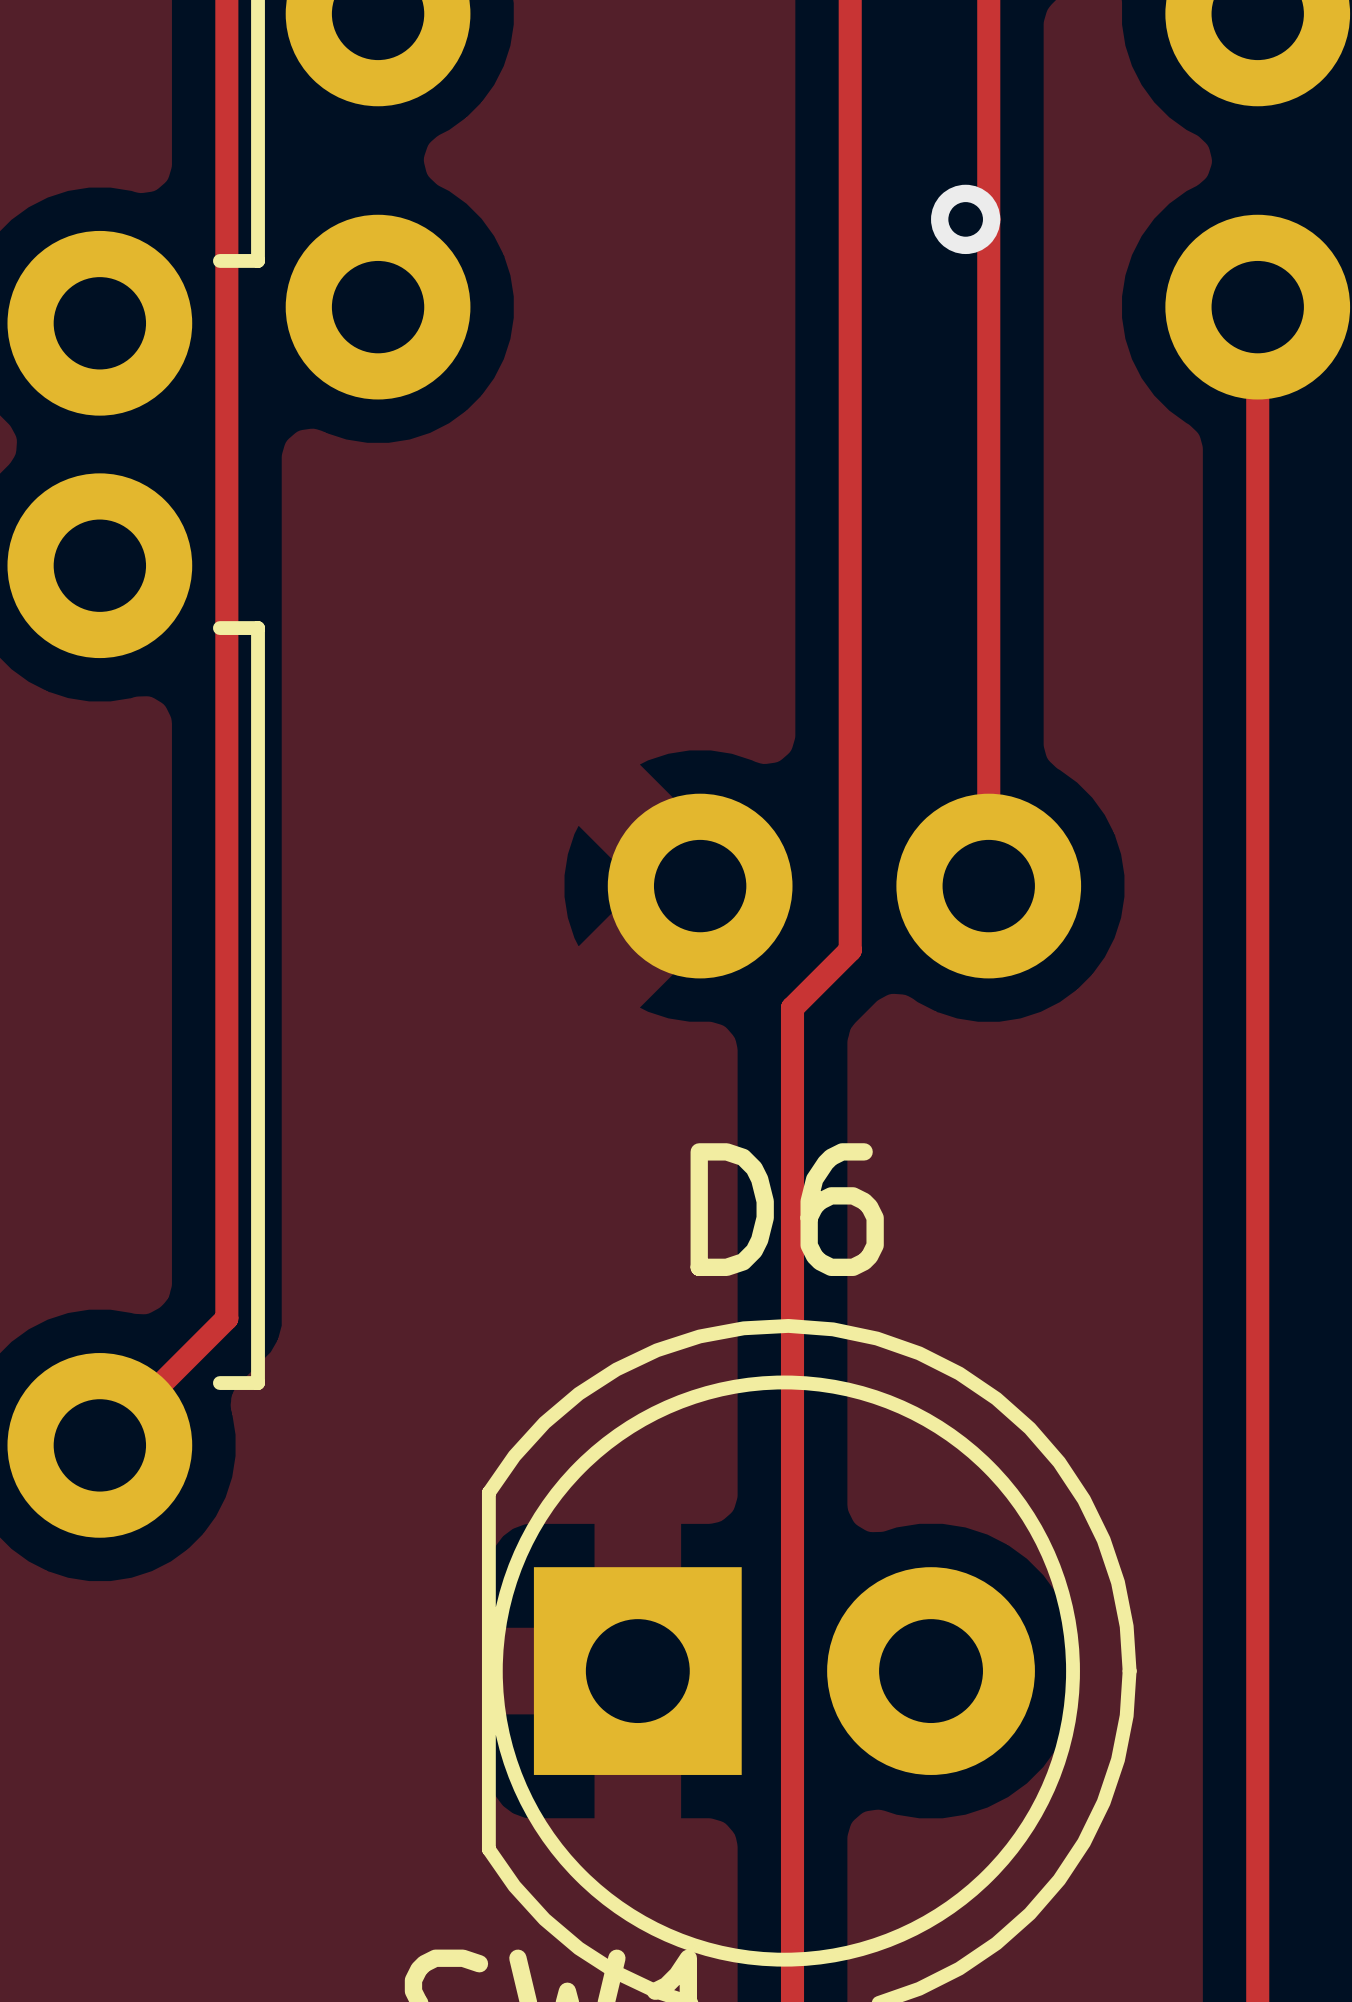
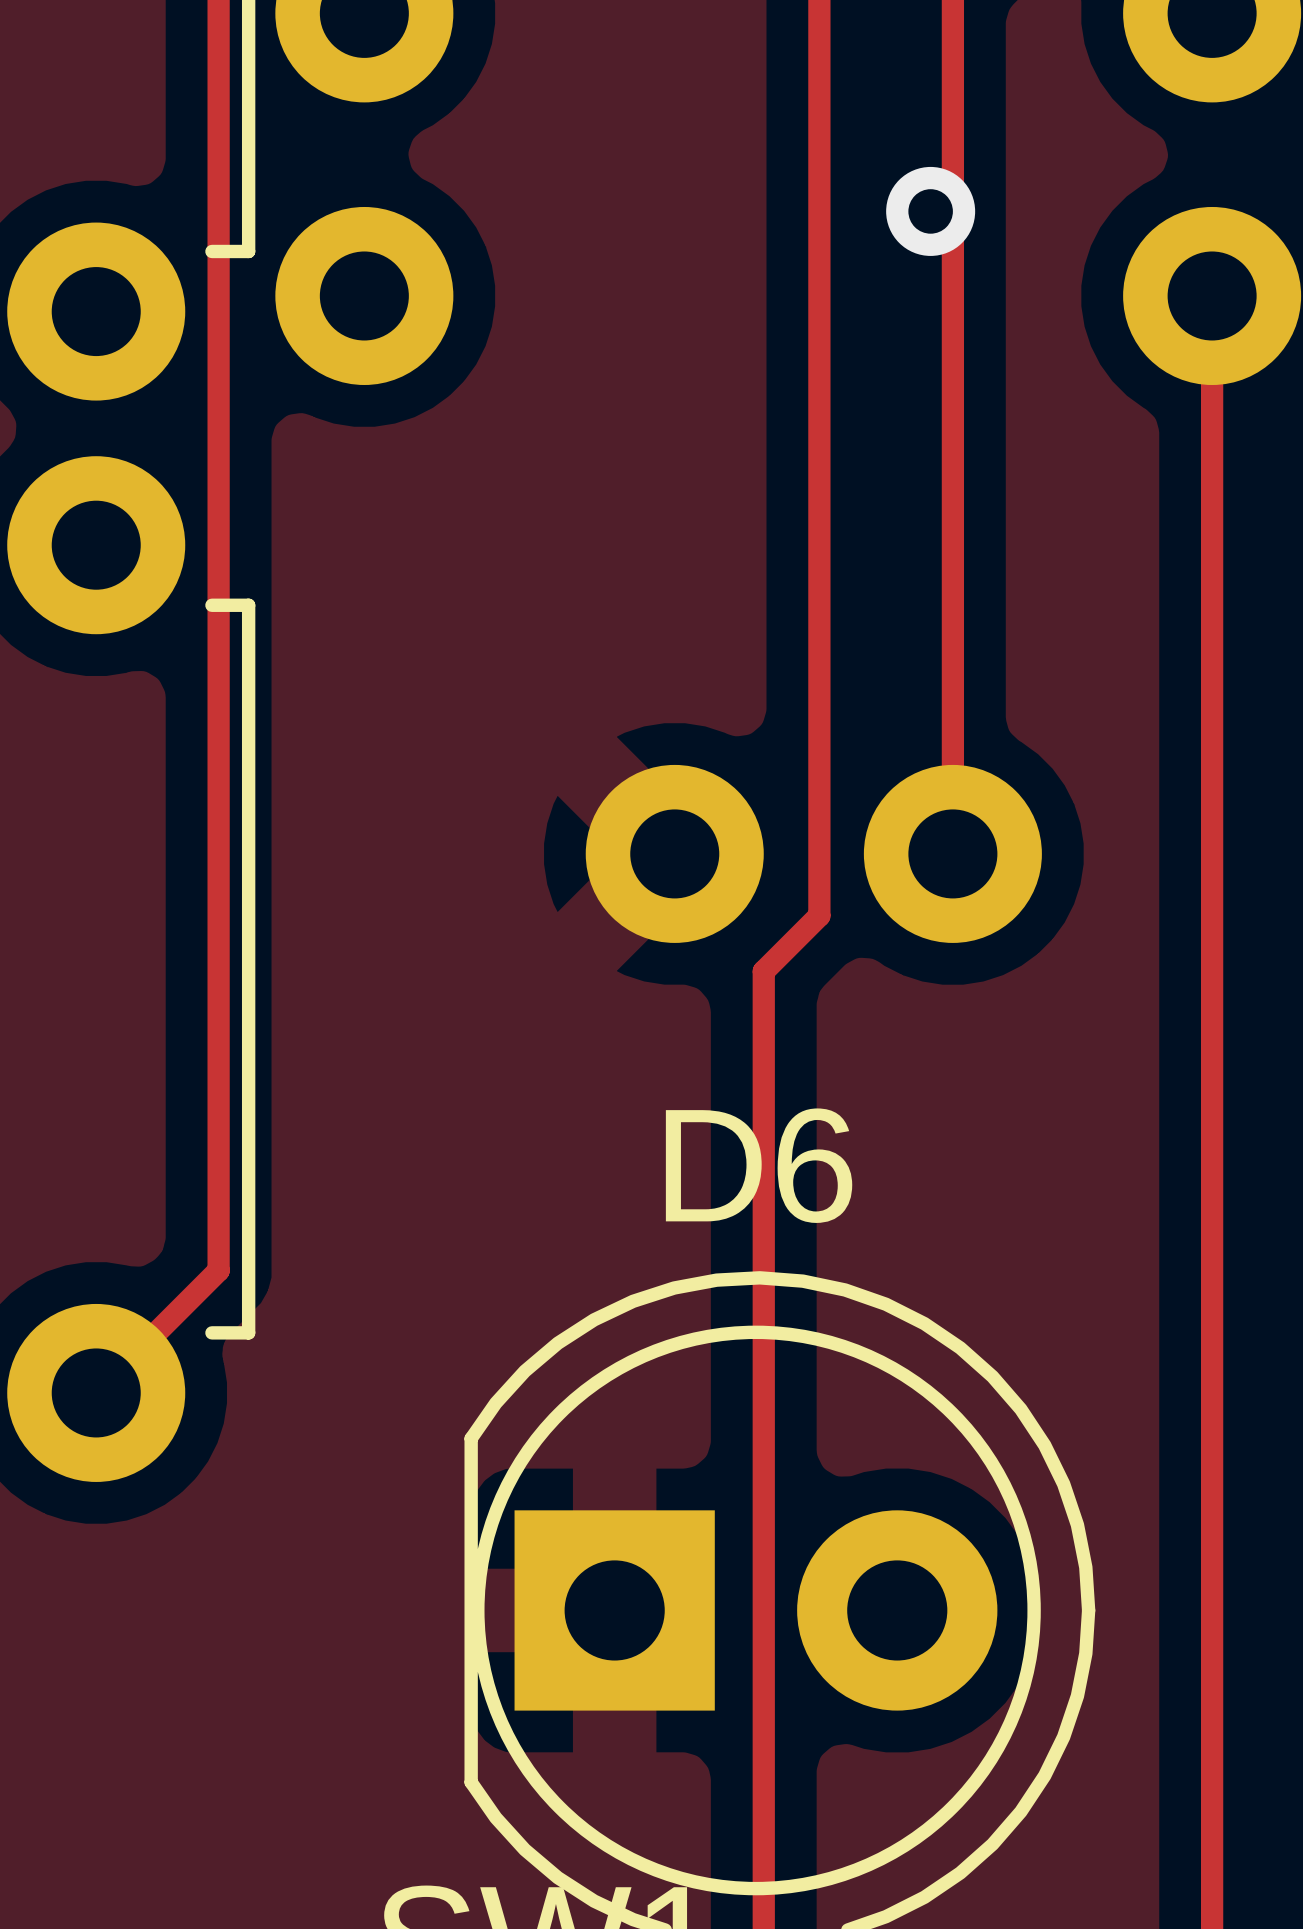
via size: [931, 184, 1001, 255] -> [886, 166, 976, 256]

